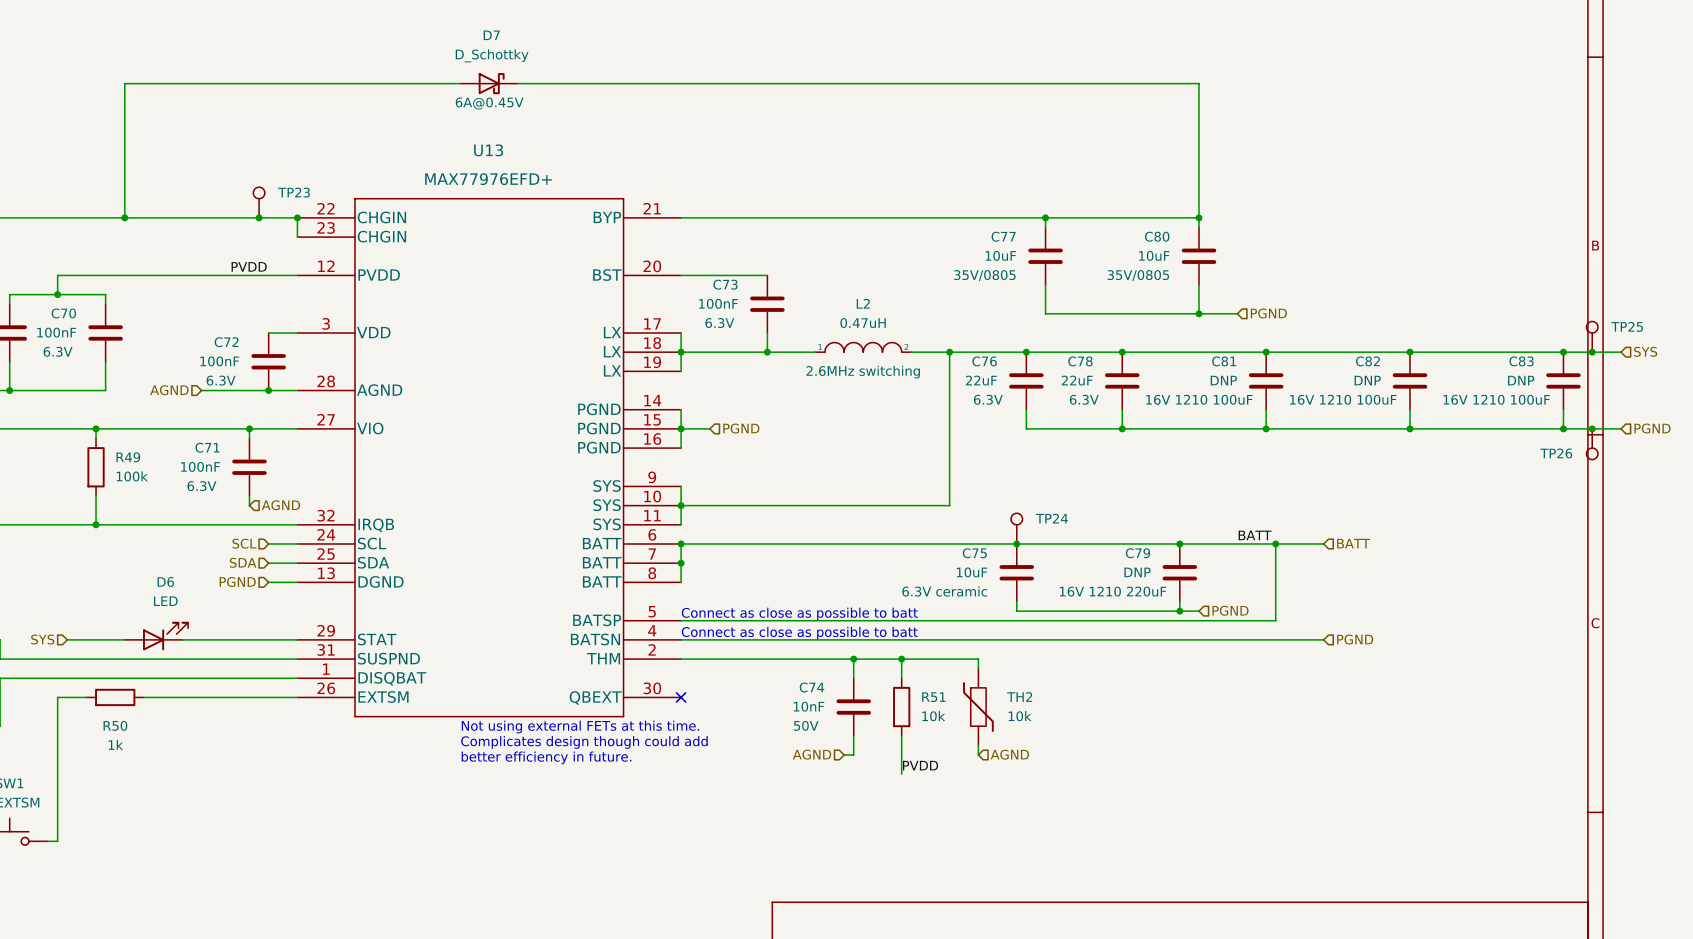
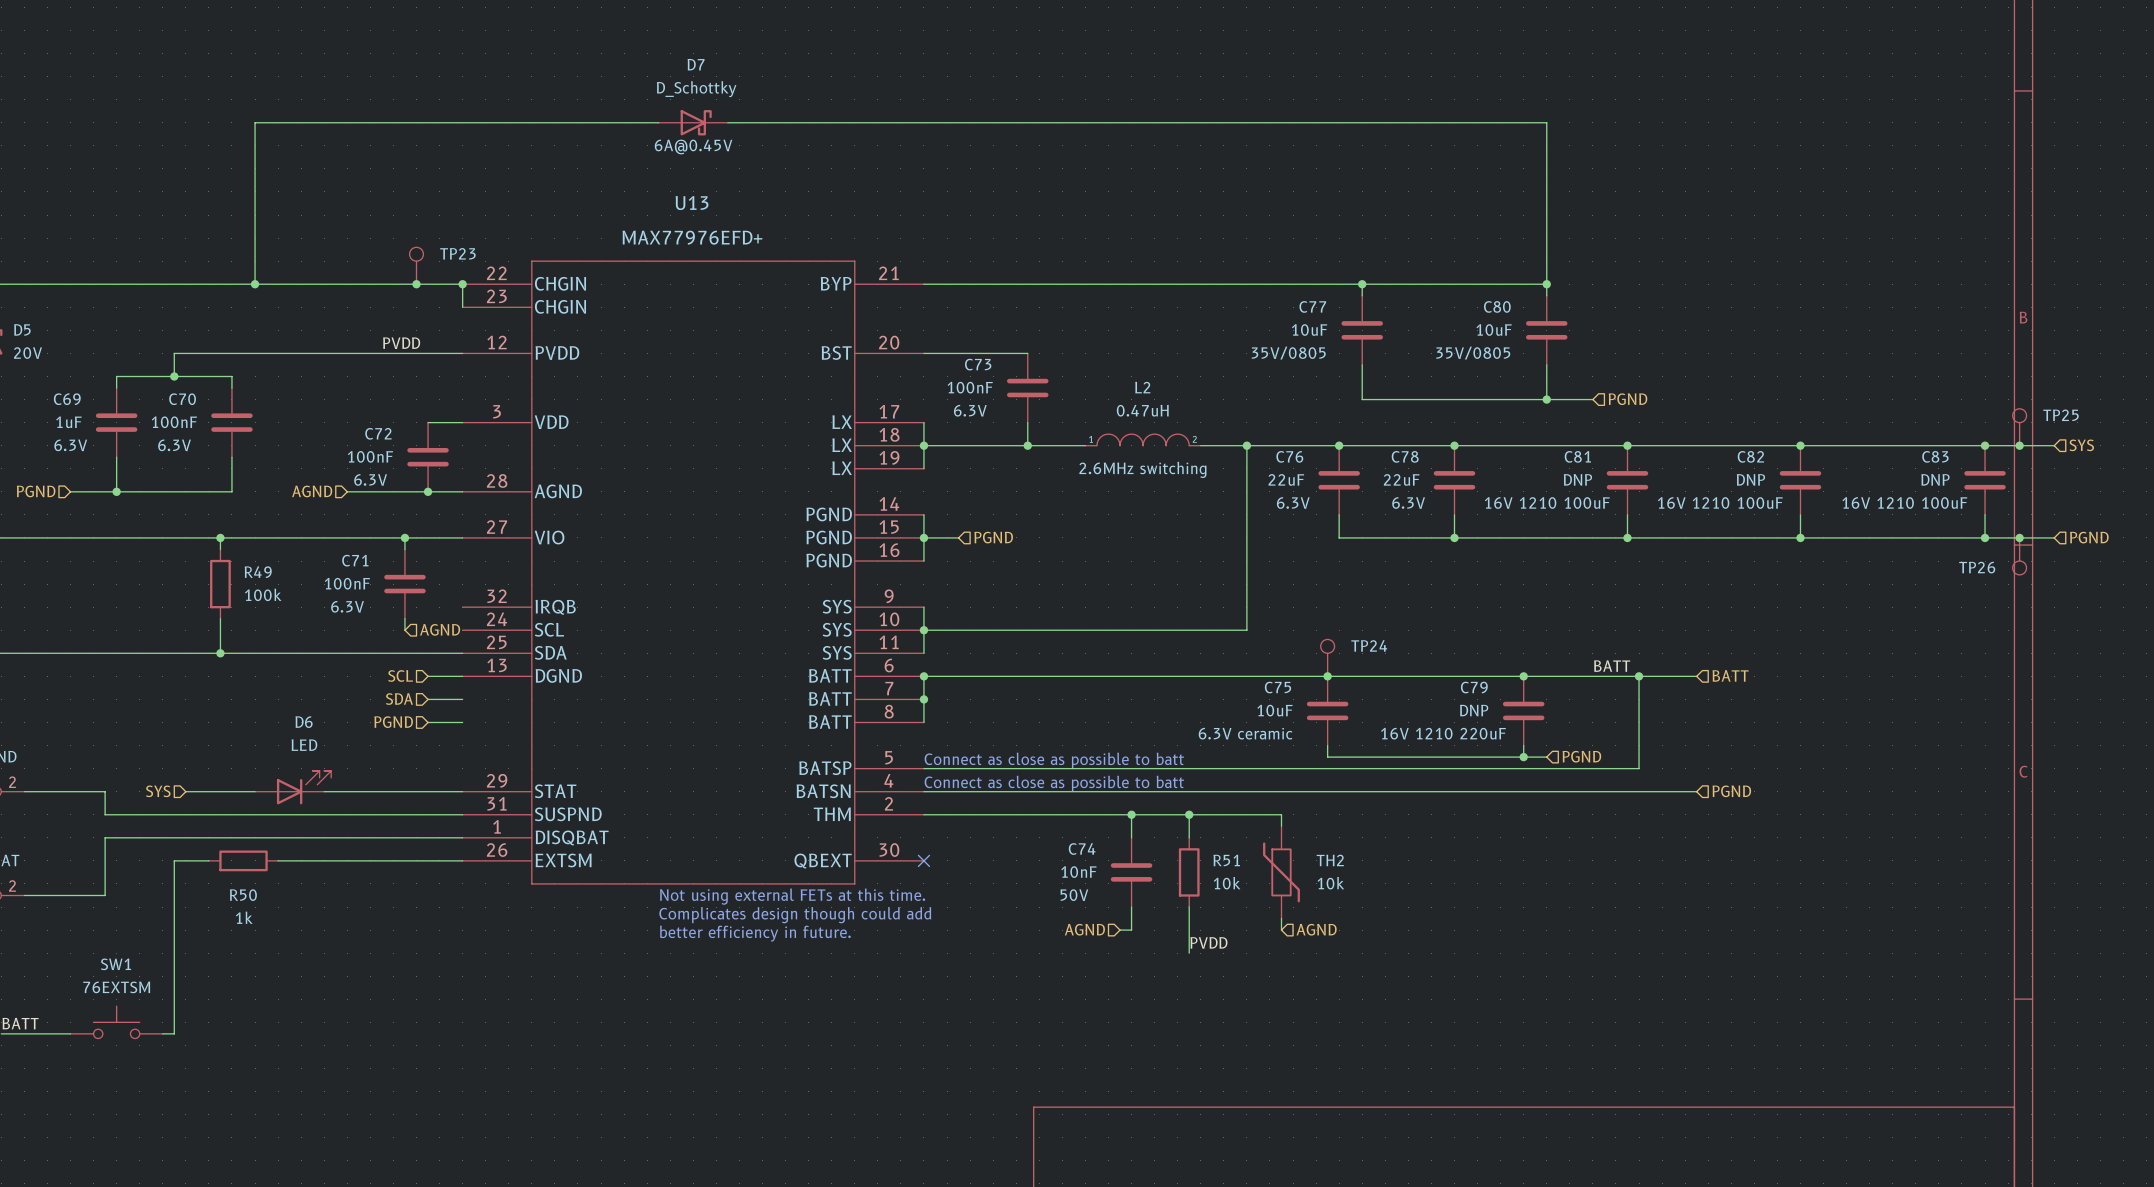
U13 symbol: [297, 198, 682, 718] -> [462, 260, 924, 885]

